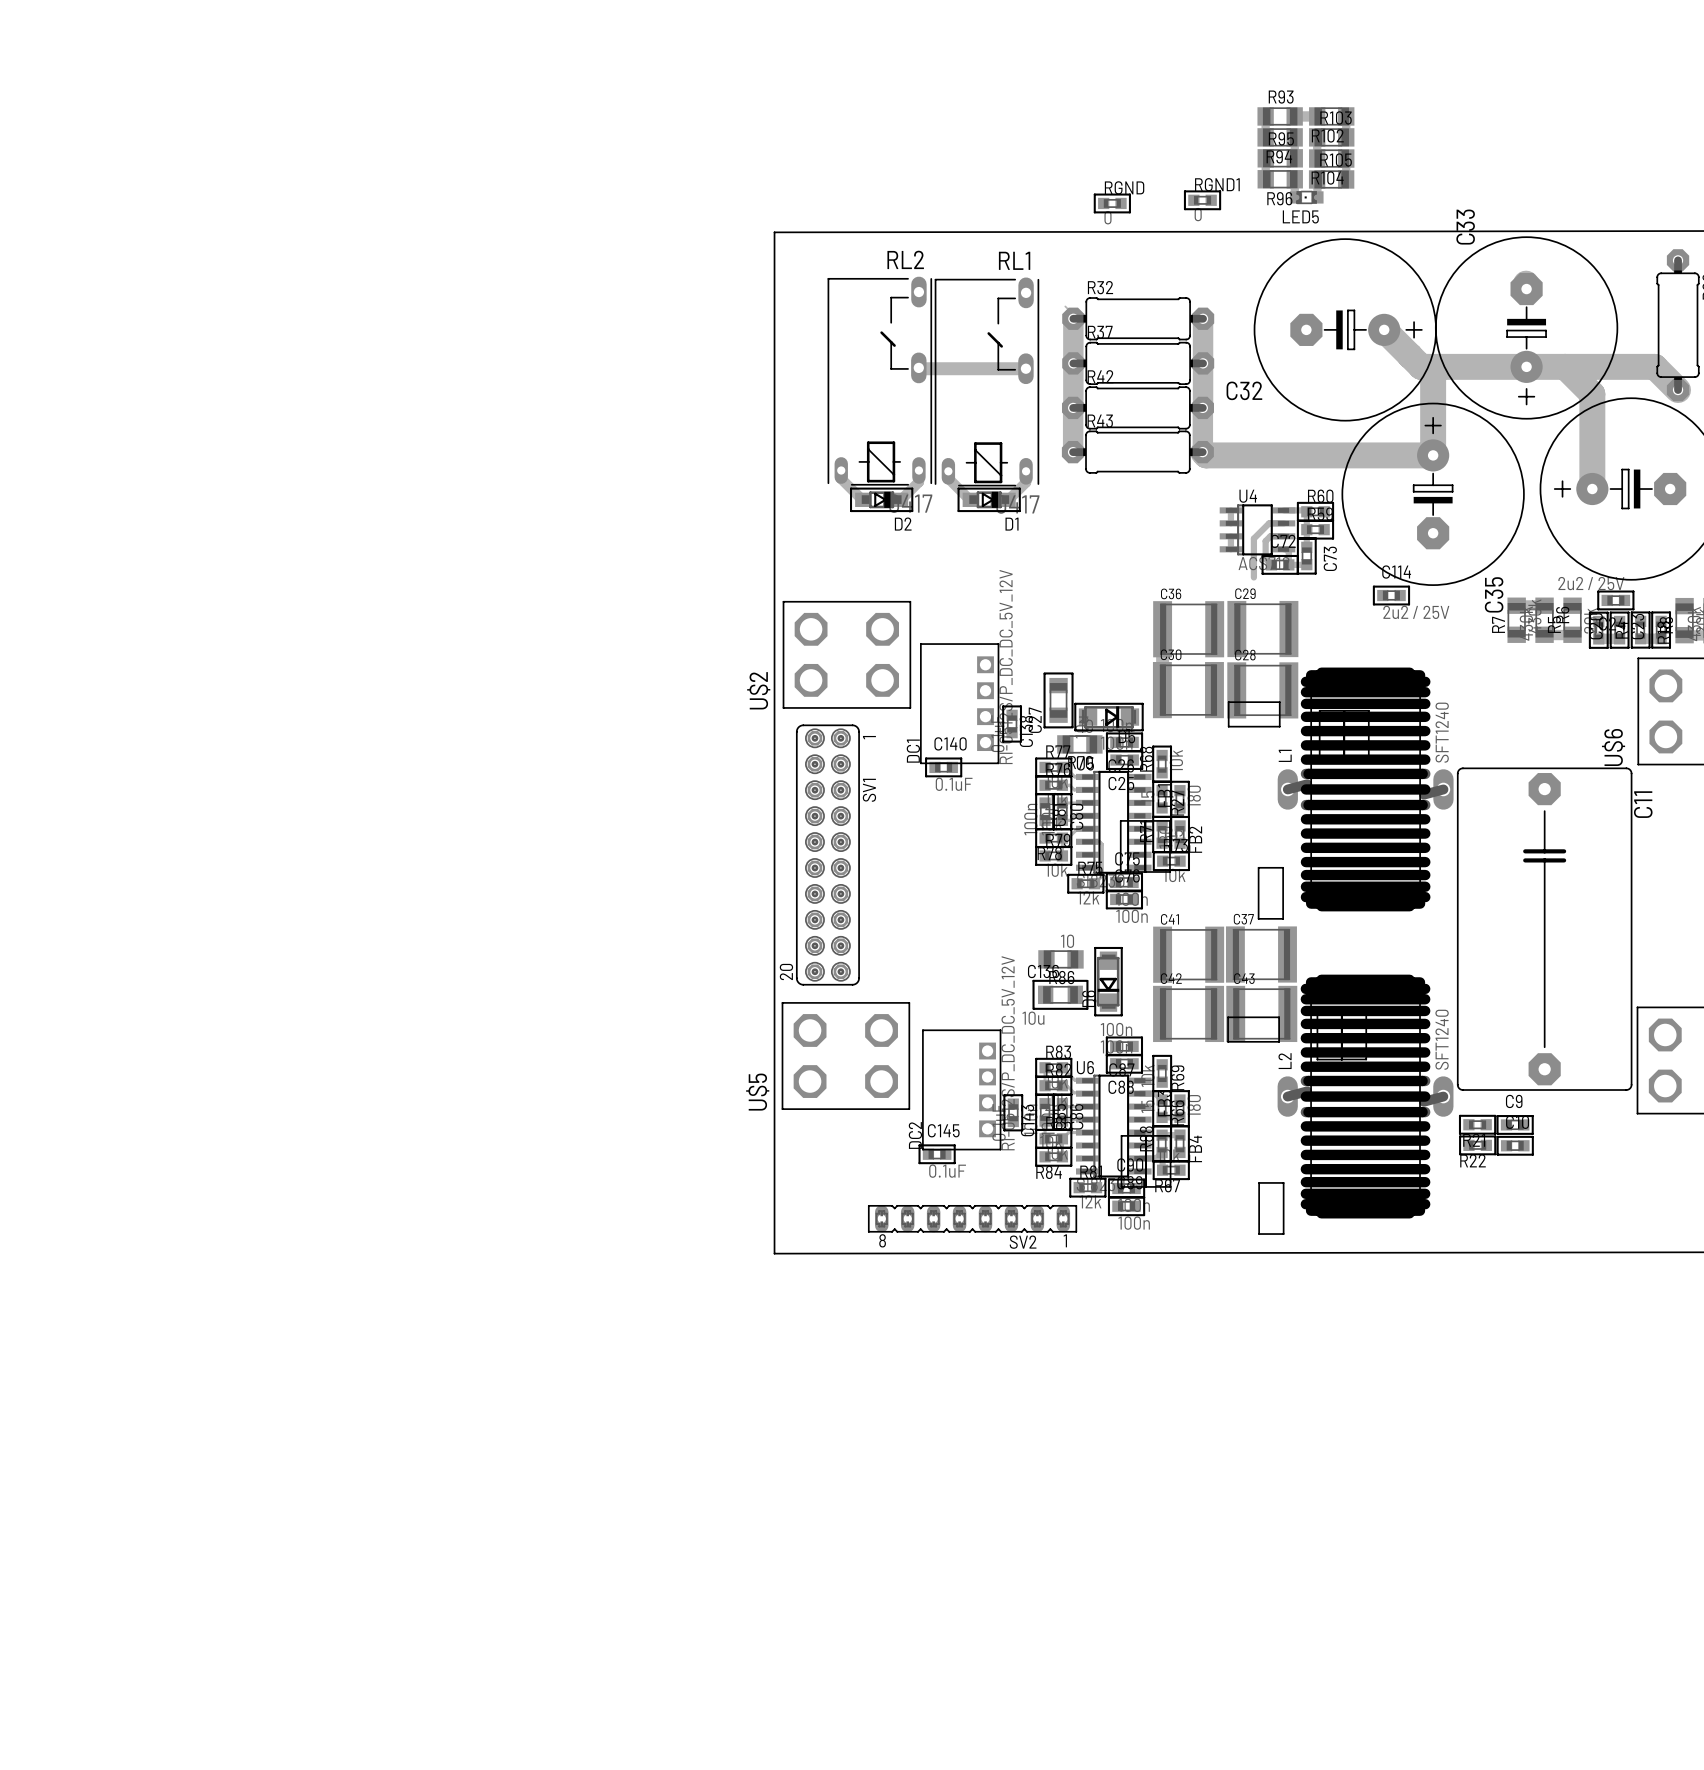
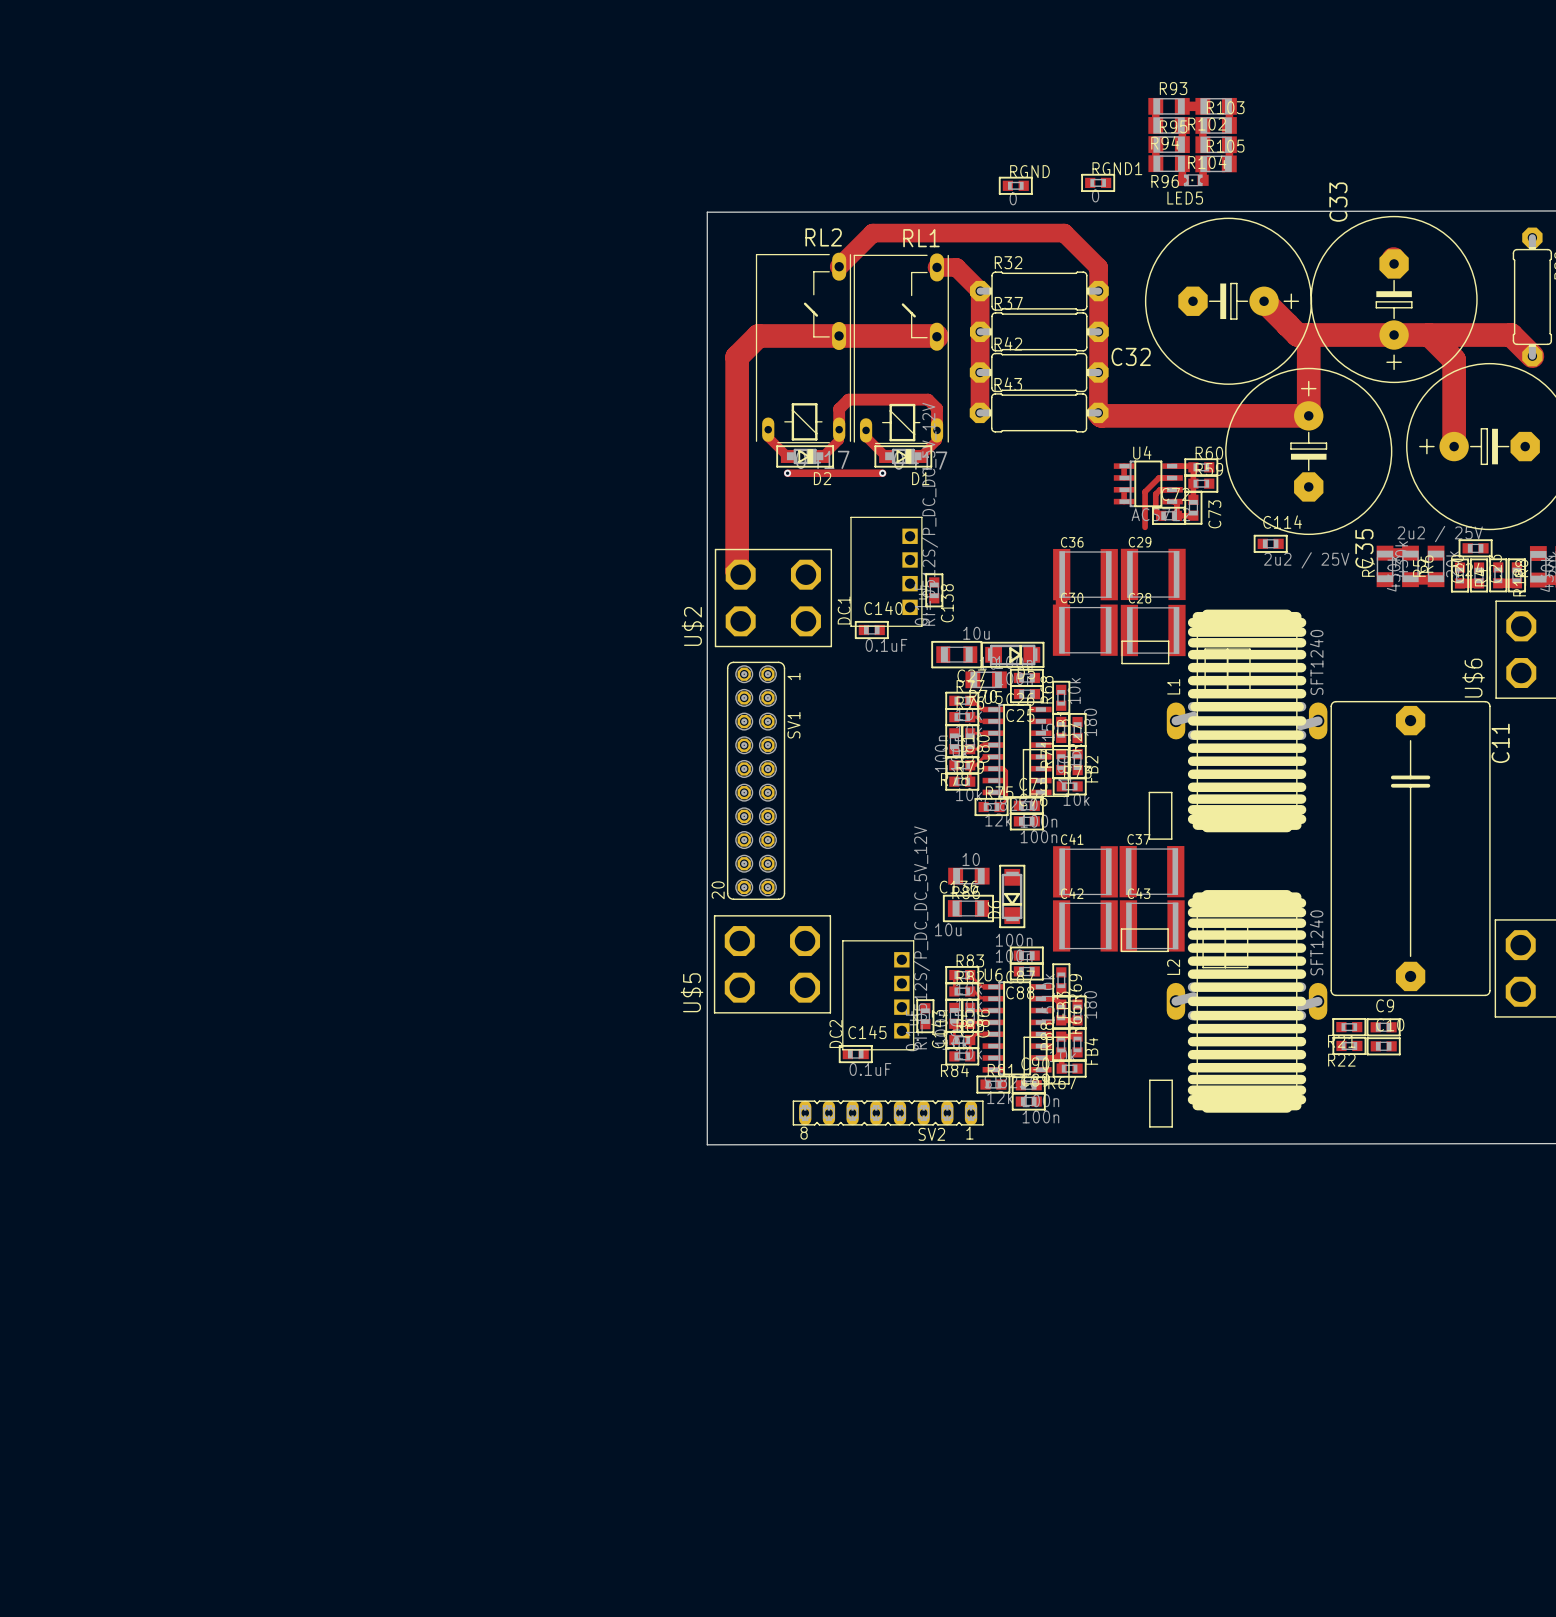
track: none -> (839, 266) (872, 233) (1064, 233) (1098, 267) (1098, 291)
track: none -> (937, 267) (956, 267) (980, 291)
track: (919, 368) (1025, 368) -> (740, 574) (737, 571) (737, 357) (758, 335) (936, 336)
track: none -> (839, 429) (839, 408) (848, 399) (928, 399) (937, 408) (937, 430)
track: none -> (787, 473) (882, 473)
via: none -> (787, 473)
via: none -> (882, 473)
C27 rotation: 0° (1058, 700) -> 90° counterclockwise (956, 654)
DC1 position: (959, 703) -> (886, 571)
C138 position: (1012, 724) -> (934, 590)
C140 position: (943, 767) -> (871, 630)

